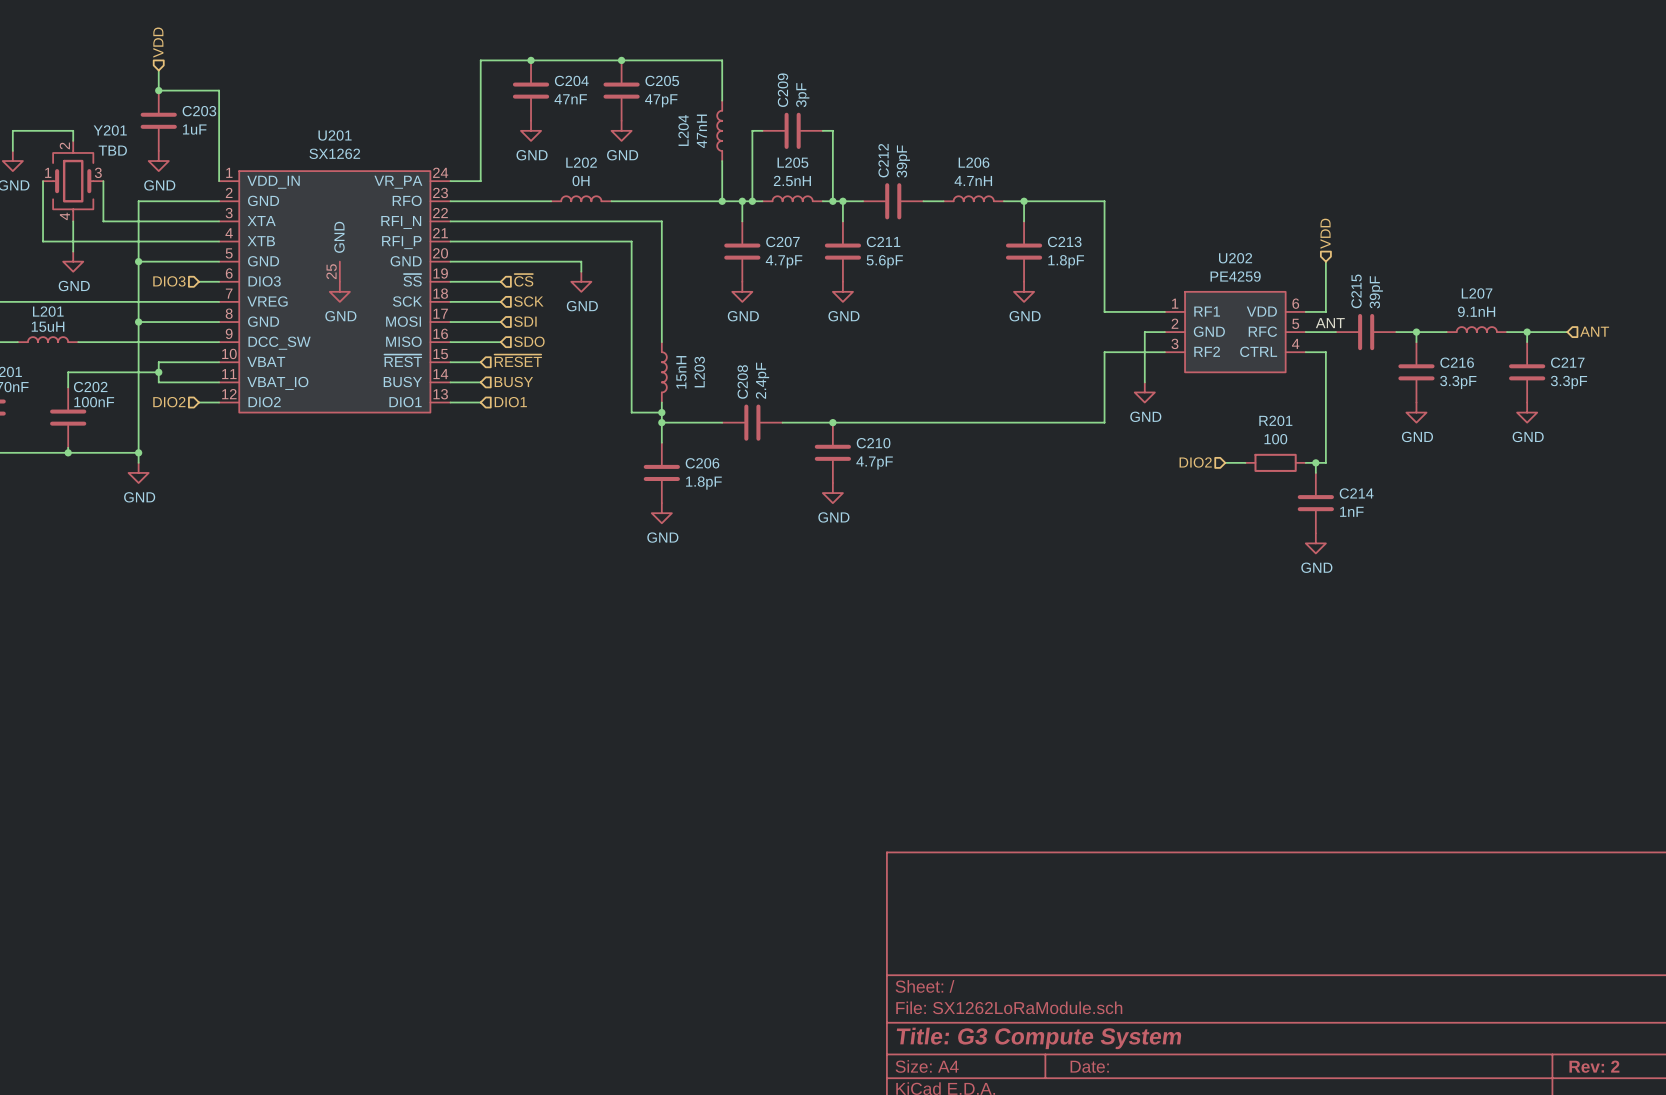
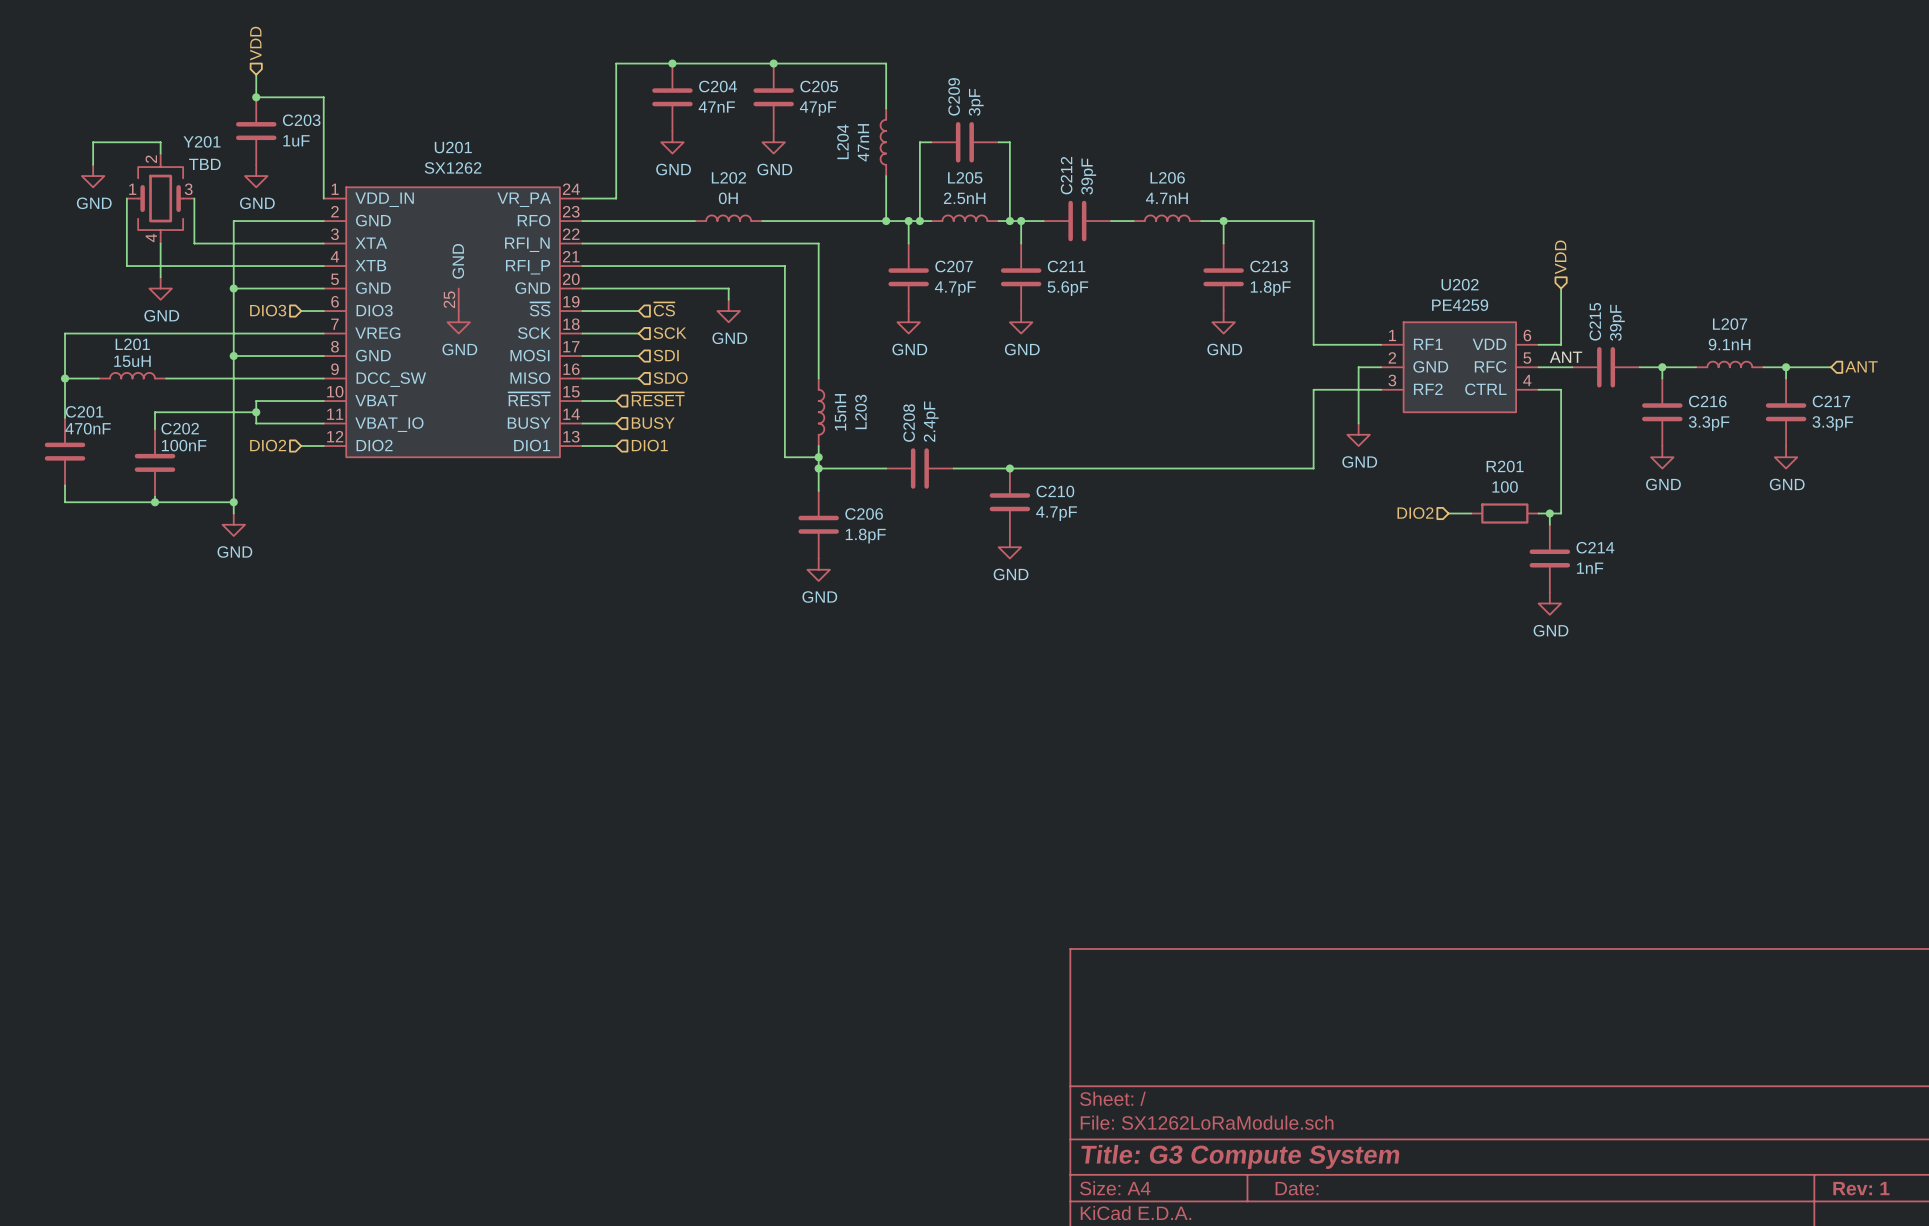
title block: Rev: 2 (1594, 1066) -> Rev: 1 (1861, 1188)

